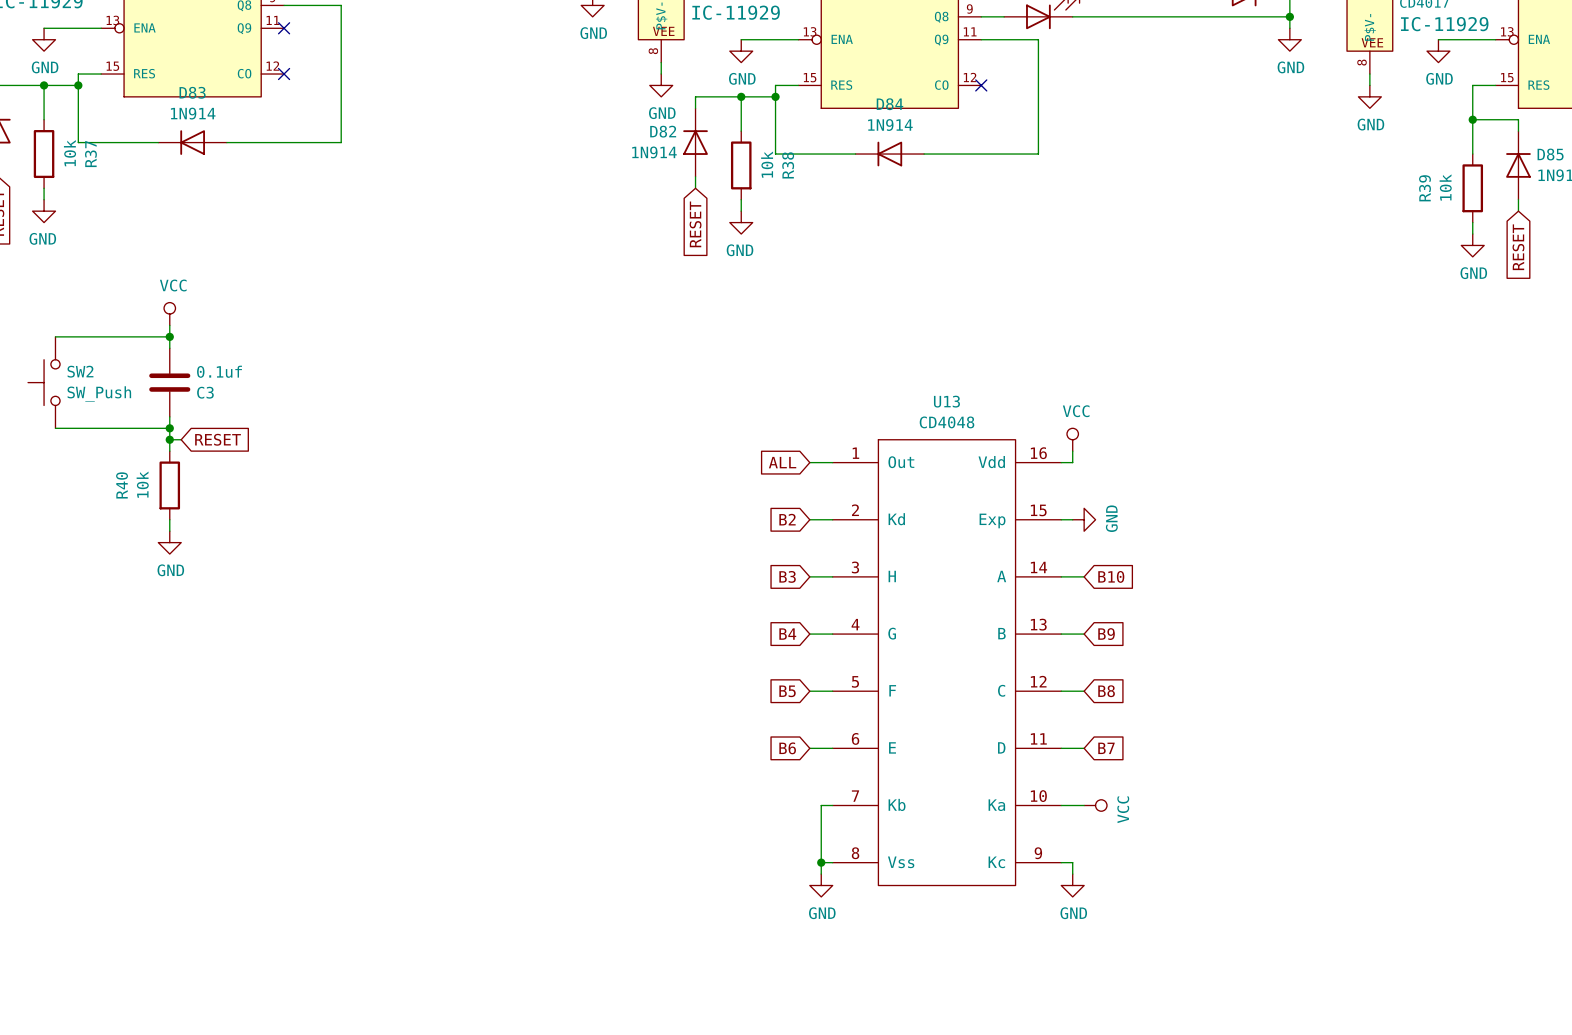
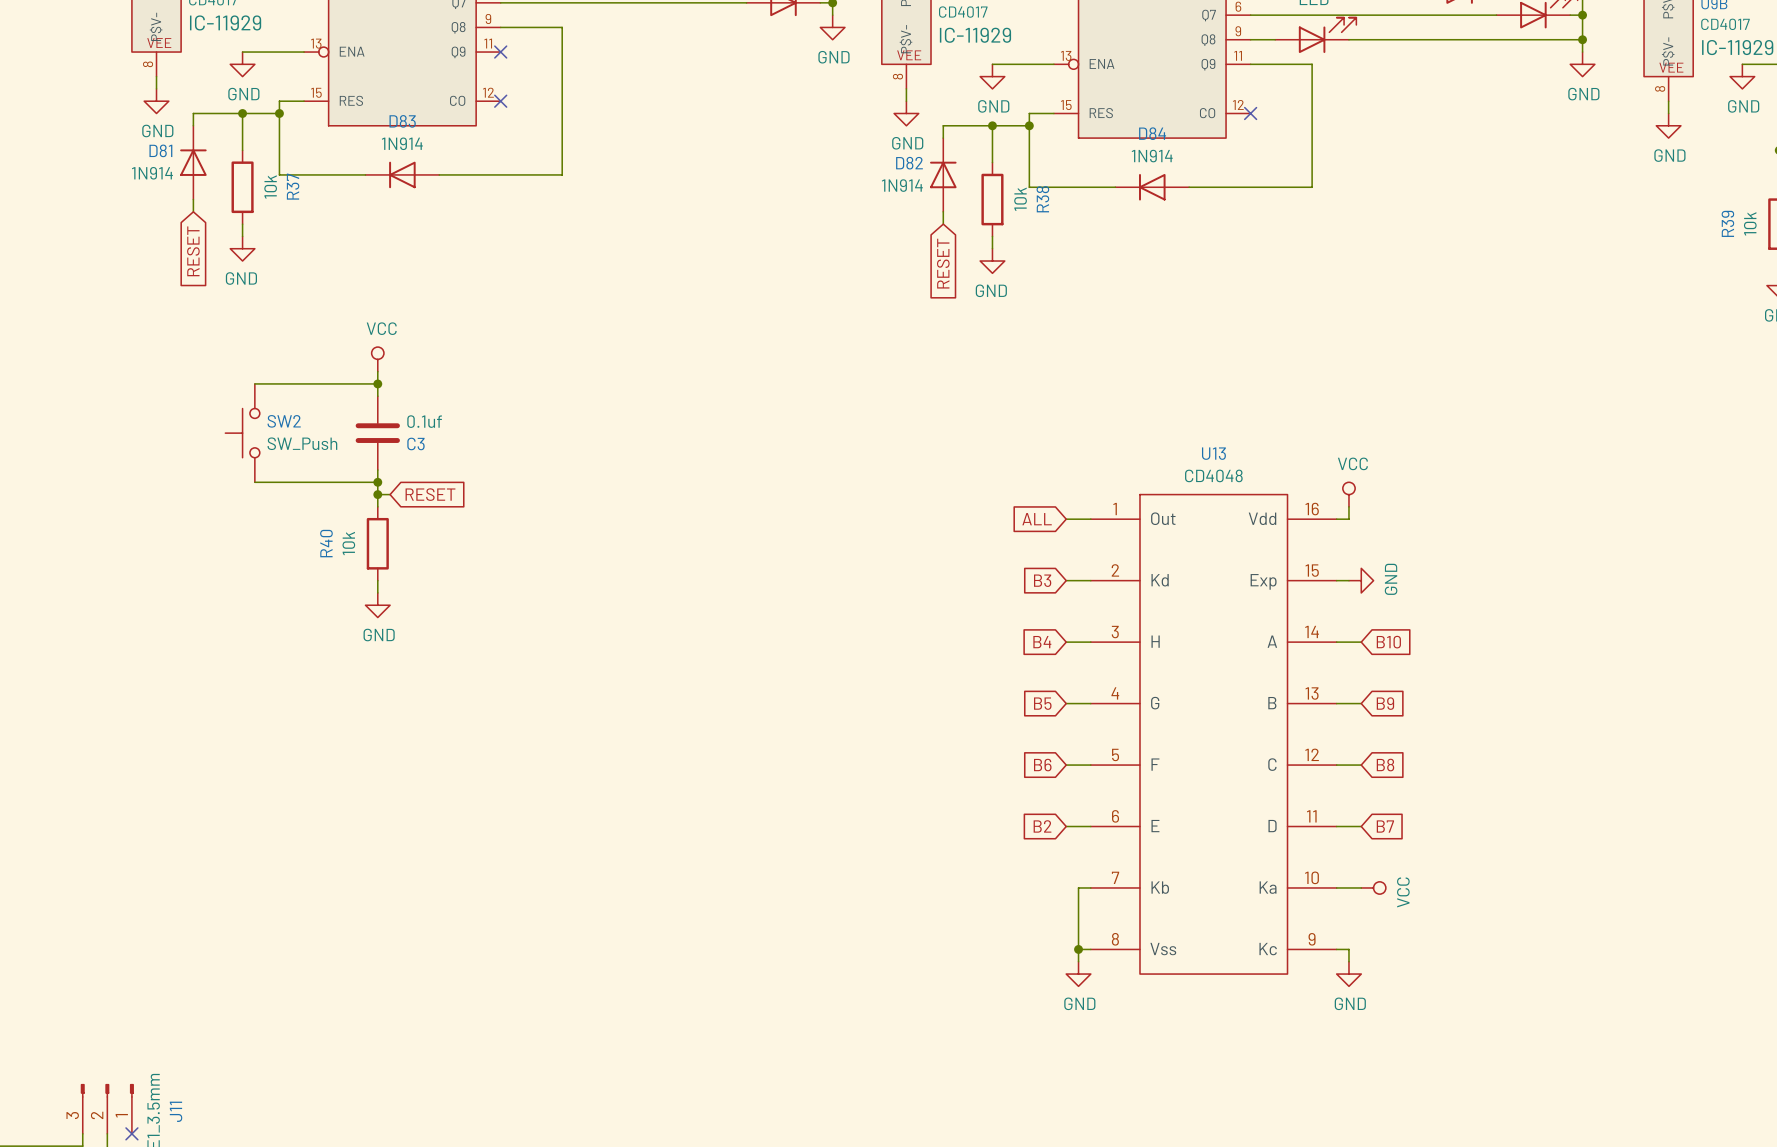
global label: B2 (787, 519) -> B3 (1042, 580)
global label: B3 (787, 576) -> B4 (1042, 642)
global label: B4 (787, 634) -> B5 (1042, 703)
global label: B5 (787, 691) -> B6 (1042, 765)
global label: B6 (787, 748) -> B2 (1042, 826)

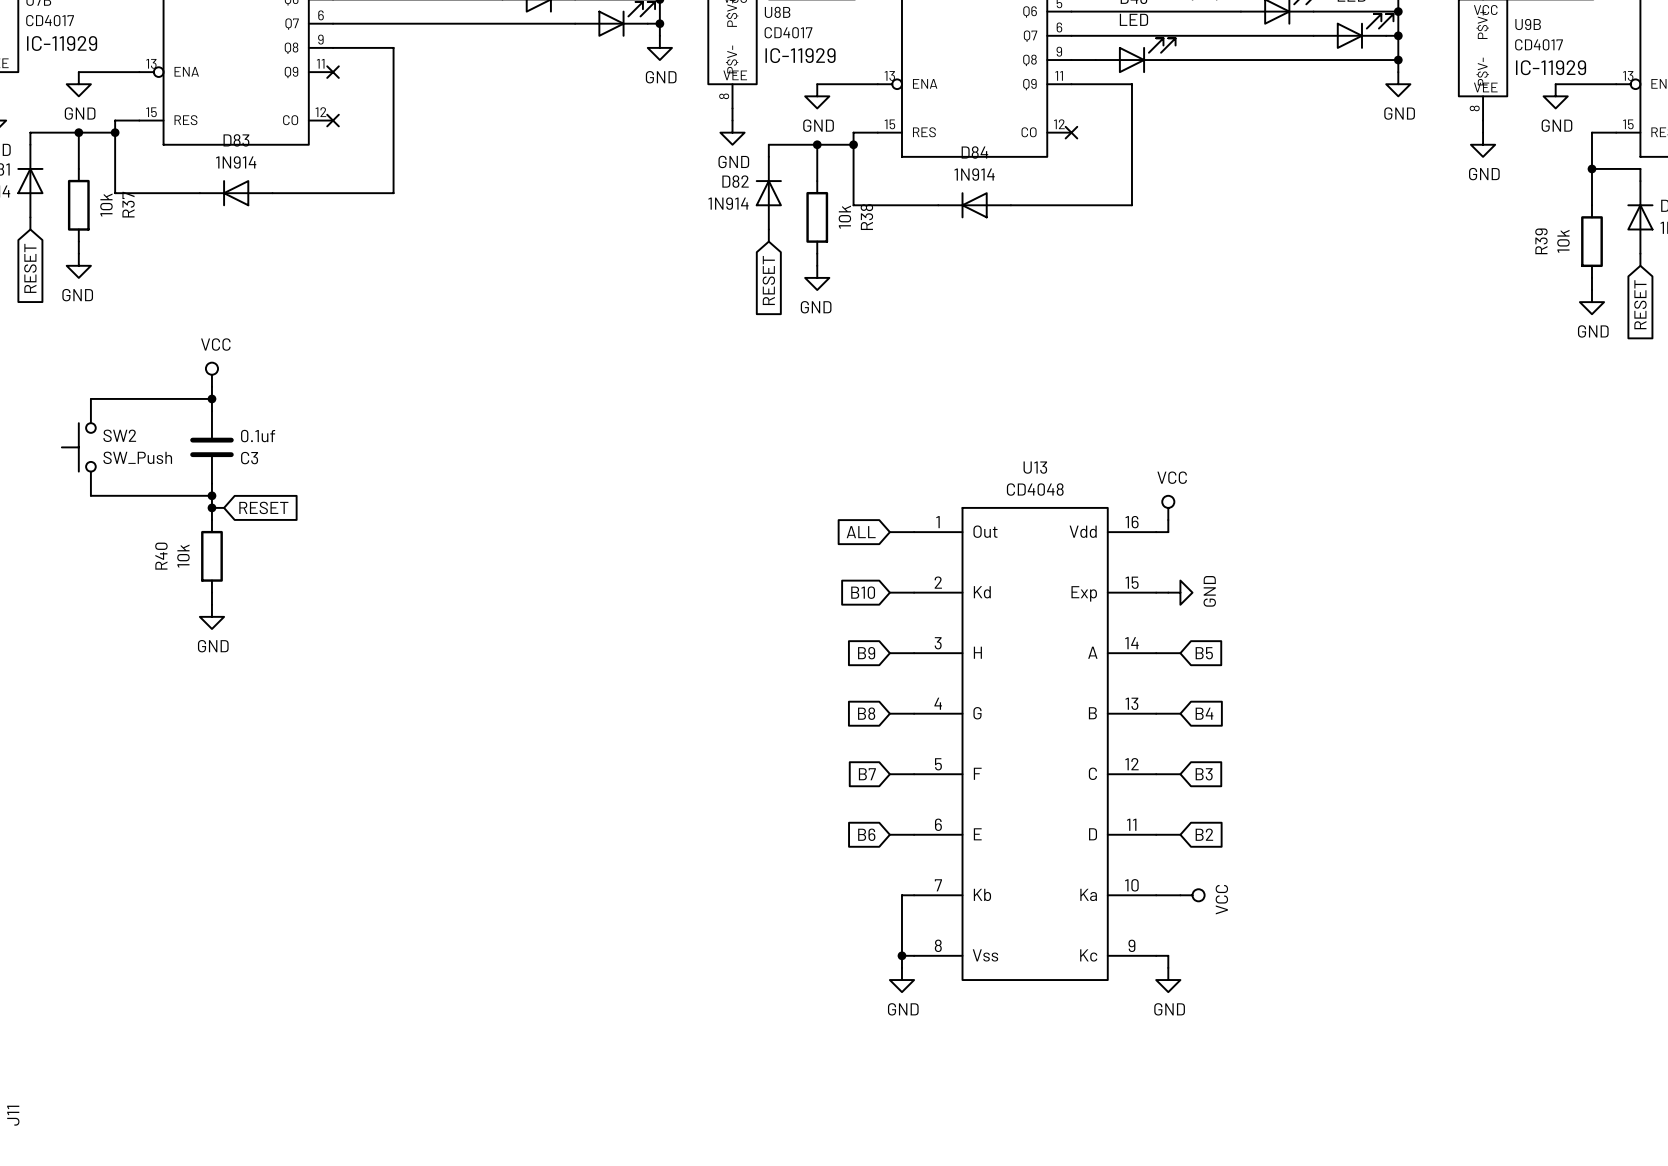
global label: B3 (1042, 580) -> B10 (863, 592)
global label: B4 (1042, 642) -> B9 (866, 653)
global label: B10 (1388, 642) -> B5 (1204, 653)
global label: B5 (1042, 703) -> B8 (866, 713)
global label: B9 (1385, 703) -> B4 (1204, 713)
global label: B6 (1042, 765) -> B7 (867, 774)
global label: B8 (1385, 765) -> B3 (1204, 774)
global label: B2 (1042, 826) -> B6 (866, 834)
global label: B7 (1385, 826) -> B2 (1204, 834)

